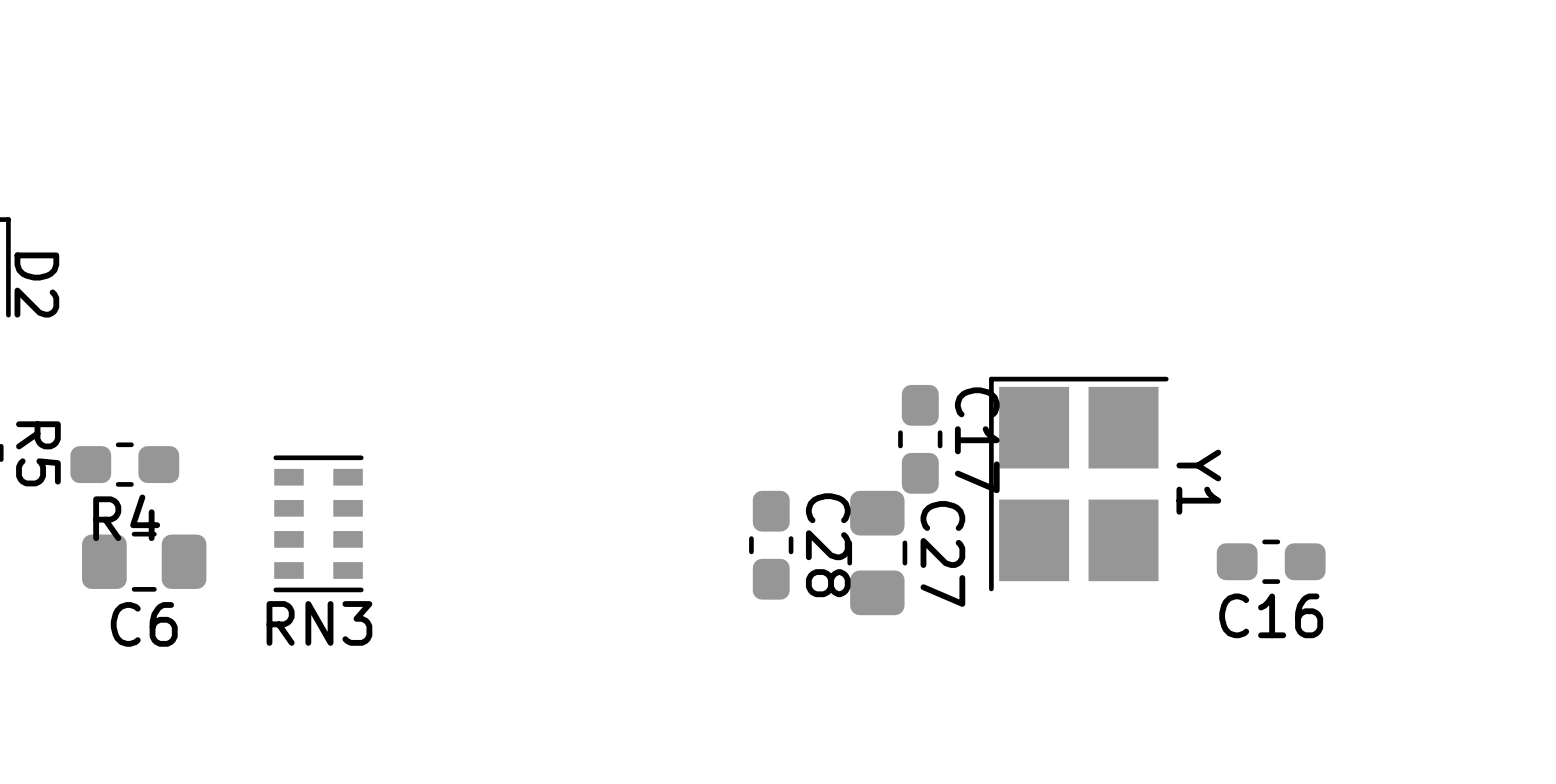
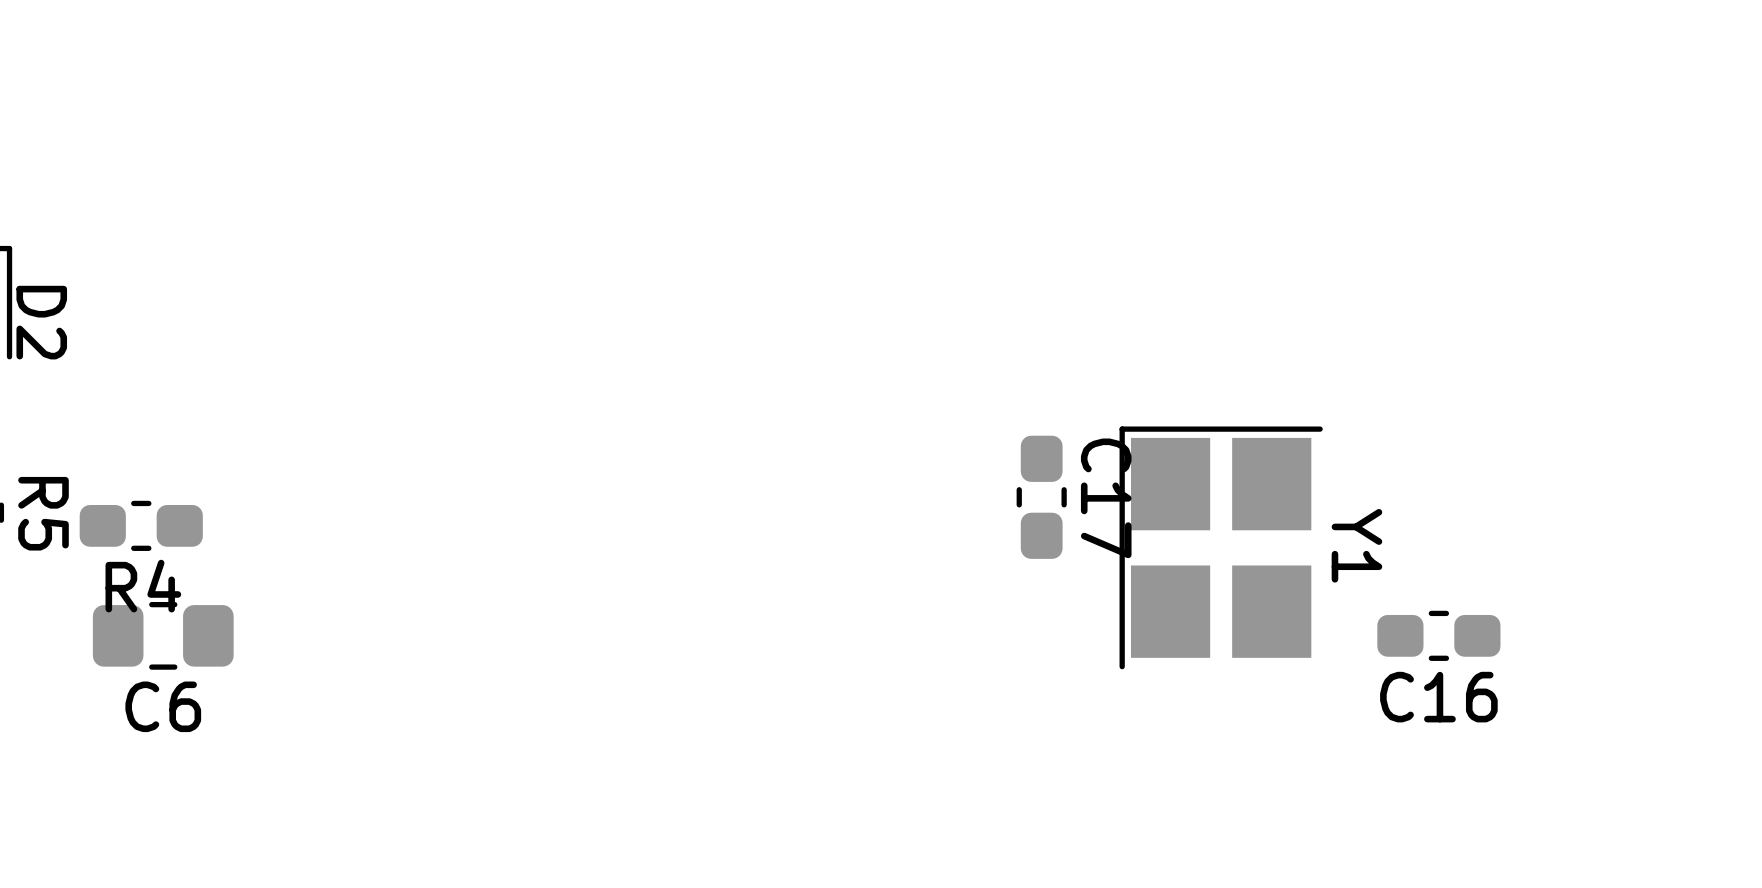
RN3: (318, 523) -> none
C28: (771, 545) -> none
C27: (877, 553) -> none

